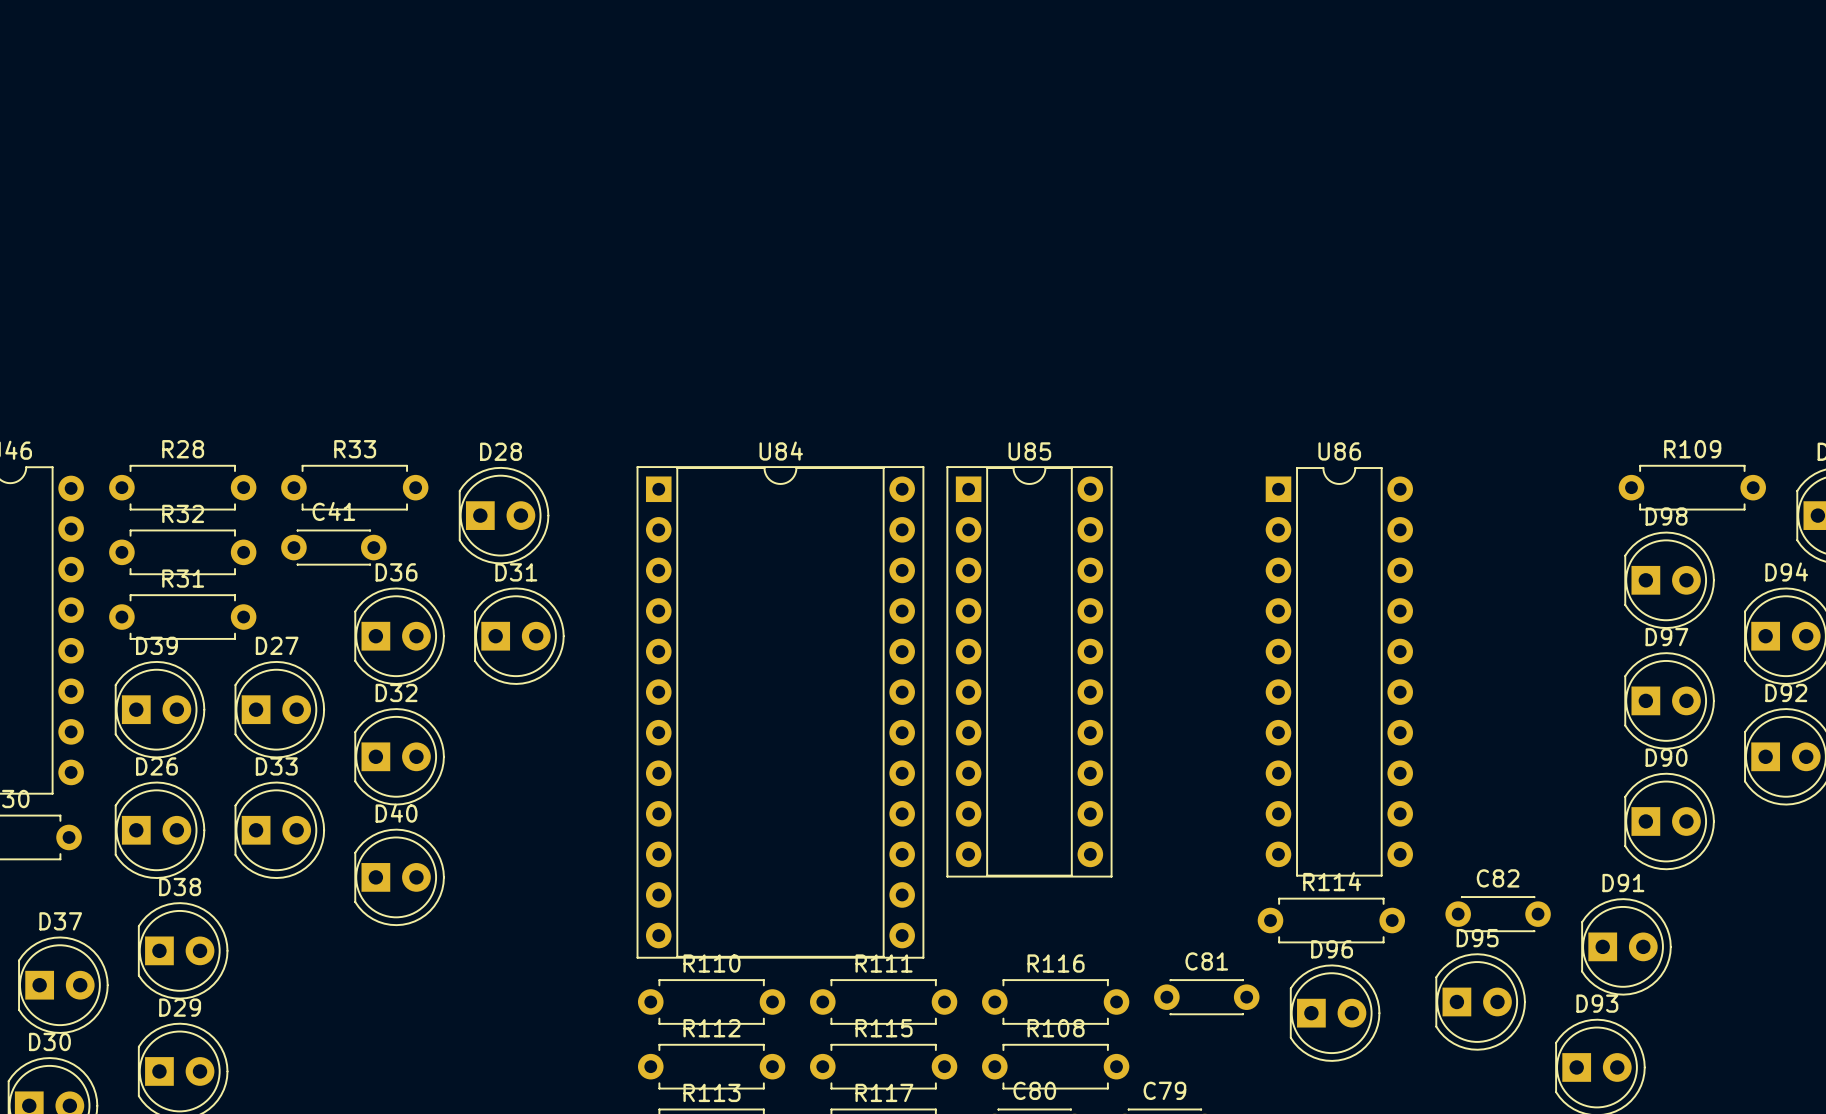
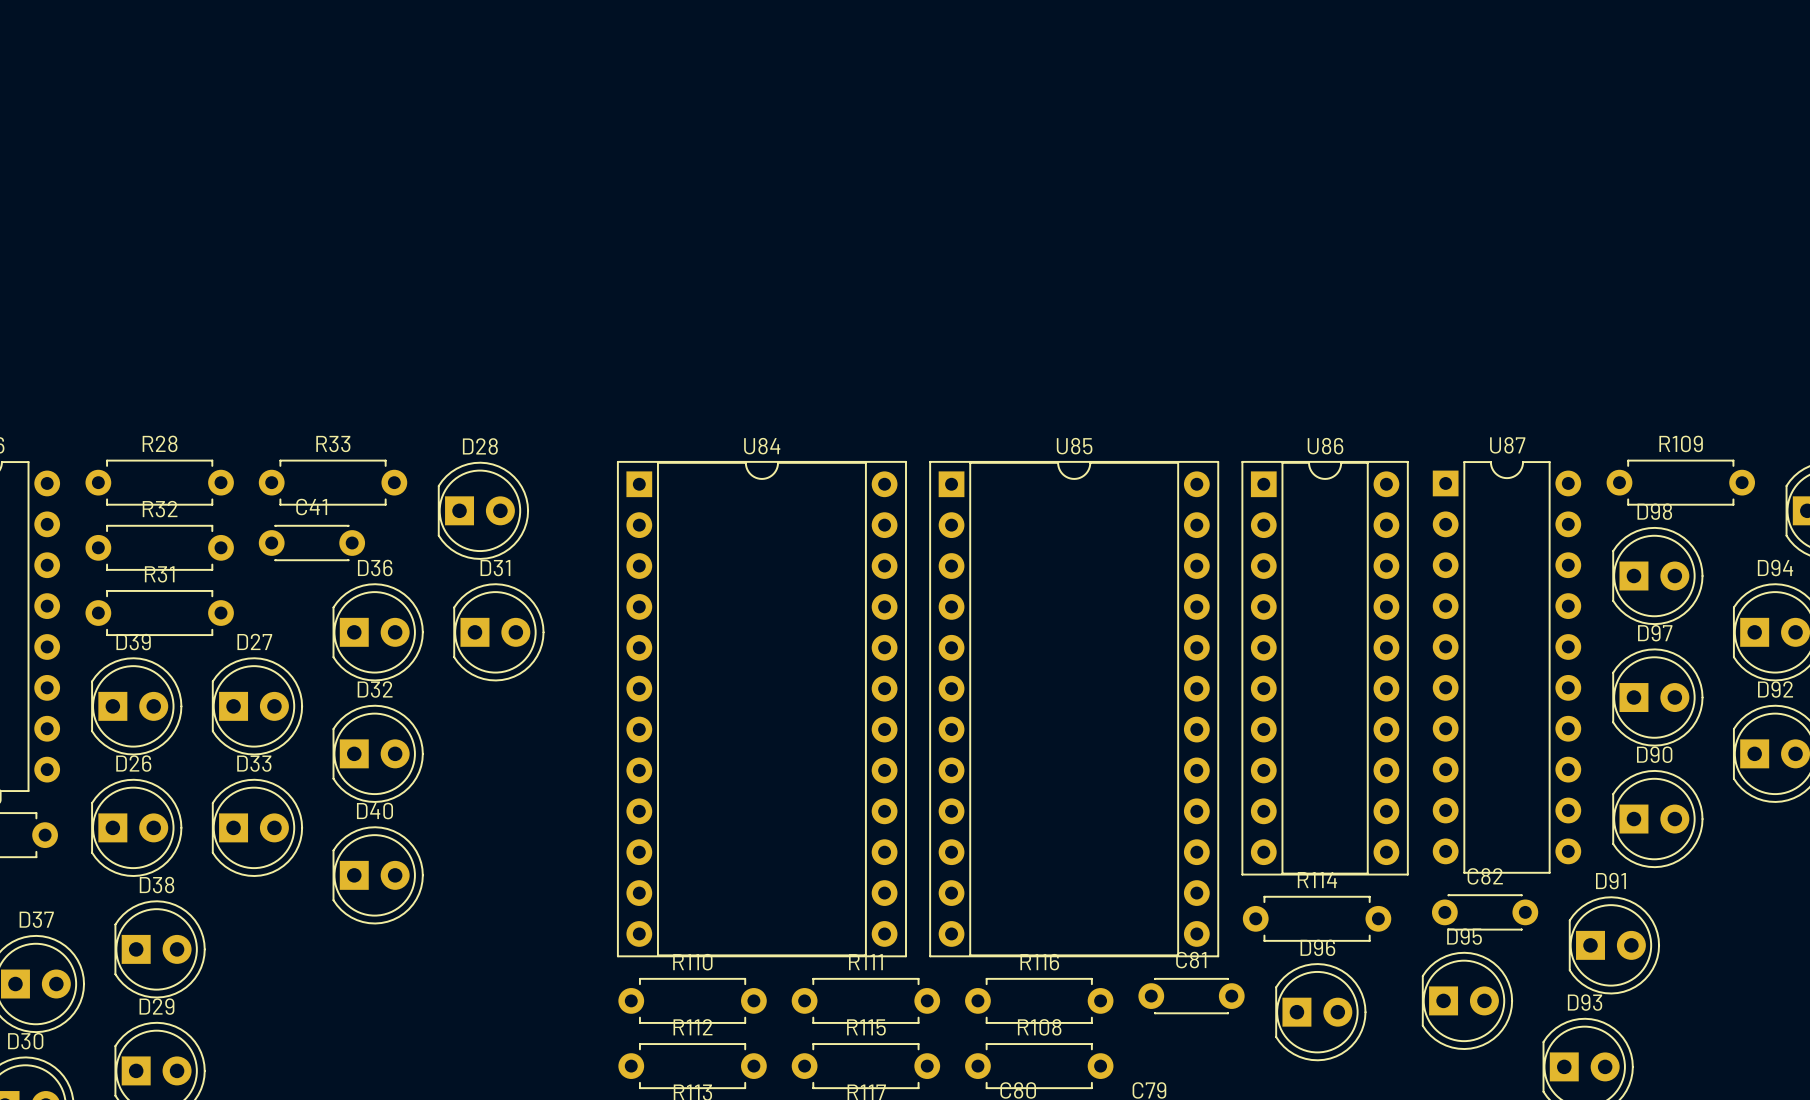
U85 name position: U85 (1029, 451) -> U85 (1074, 446)
U85 footprint: [946, 466, 1113, 878] -> [929, 460, 1220, 958]
U86 footprint: [1265, 467, 1413, 877] -> [1241, 460, 1409, 876]
U87: none -> (1506, 667)

